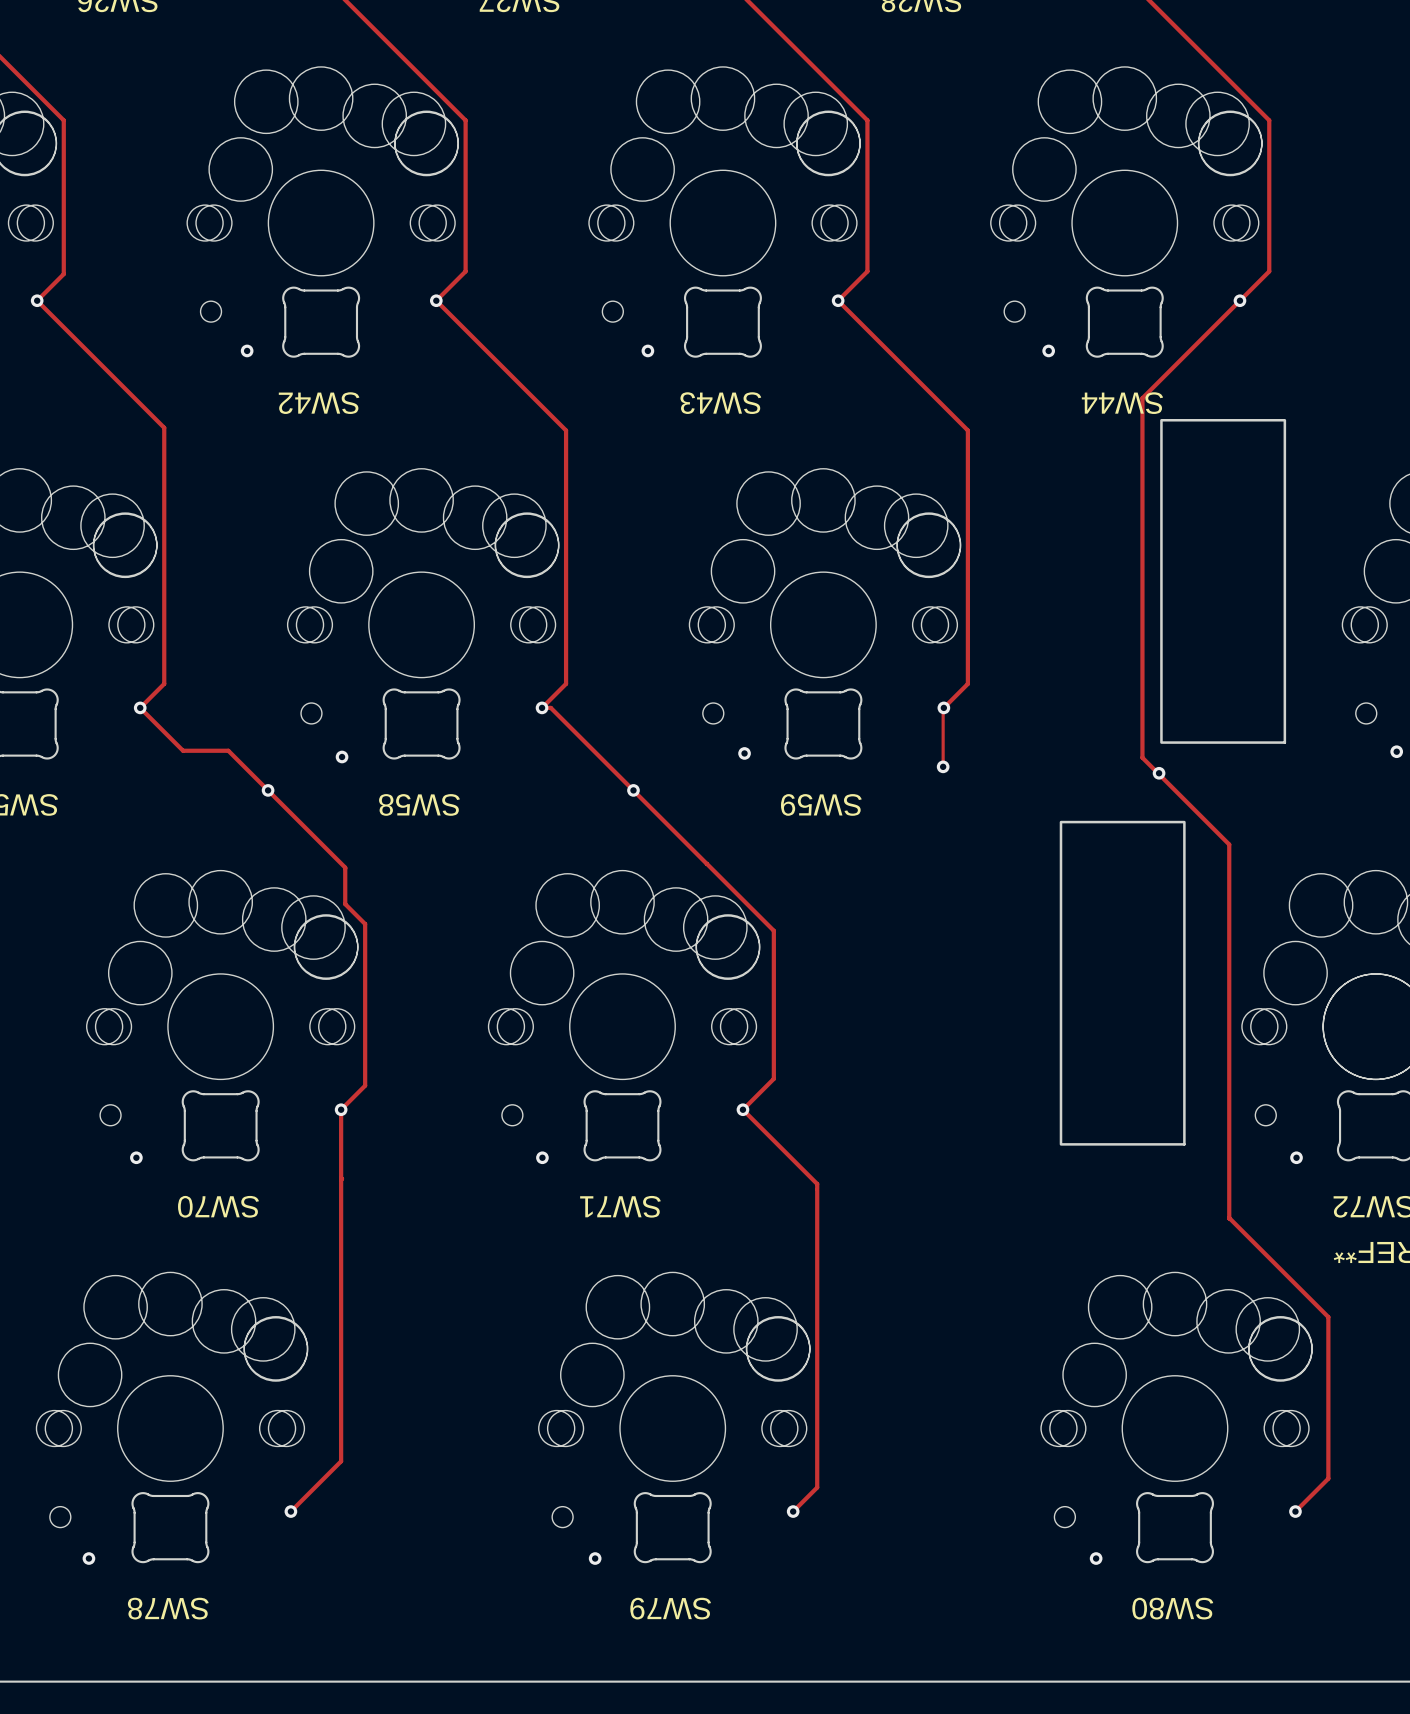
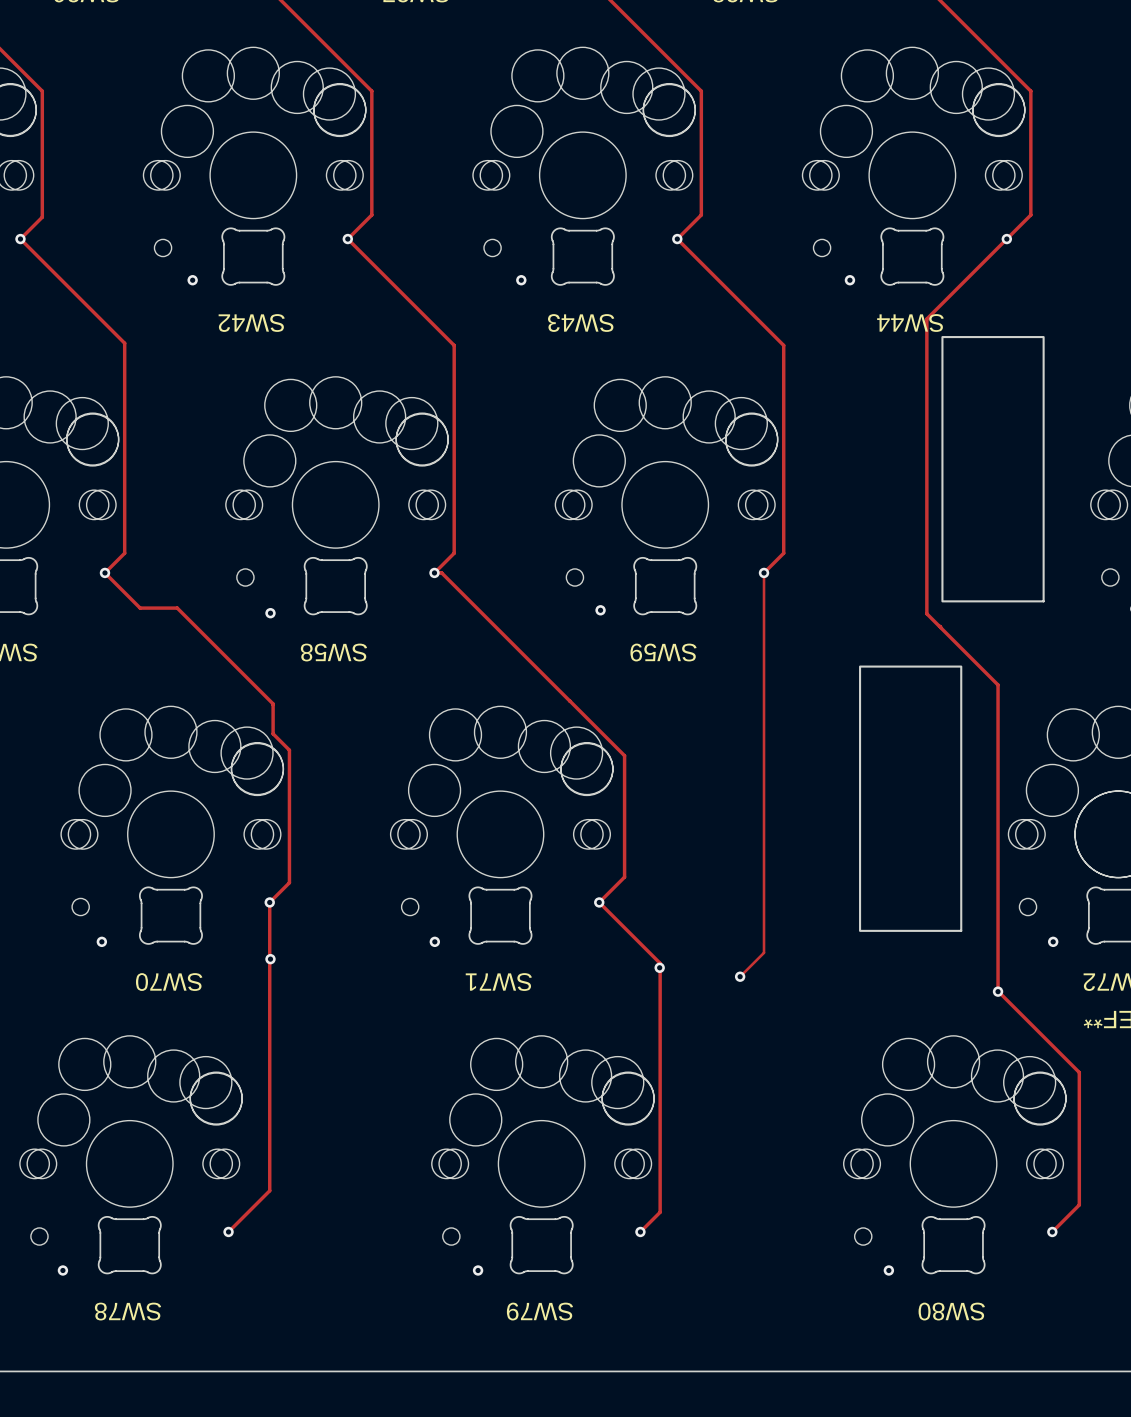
track: (943, 707) (943, 766) -> (764, 572) (764, 952) (740, 976)
via: (943, 766) -> none
via: (1159, 773) -> none
via: (268, 790) -> none
via: (633, 790) -> none
via: none -> (270, 959)
via: none -> (659, 967)
via: none -> (740, 976)
via: none -> (998, 991)

